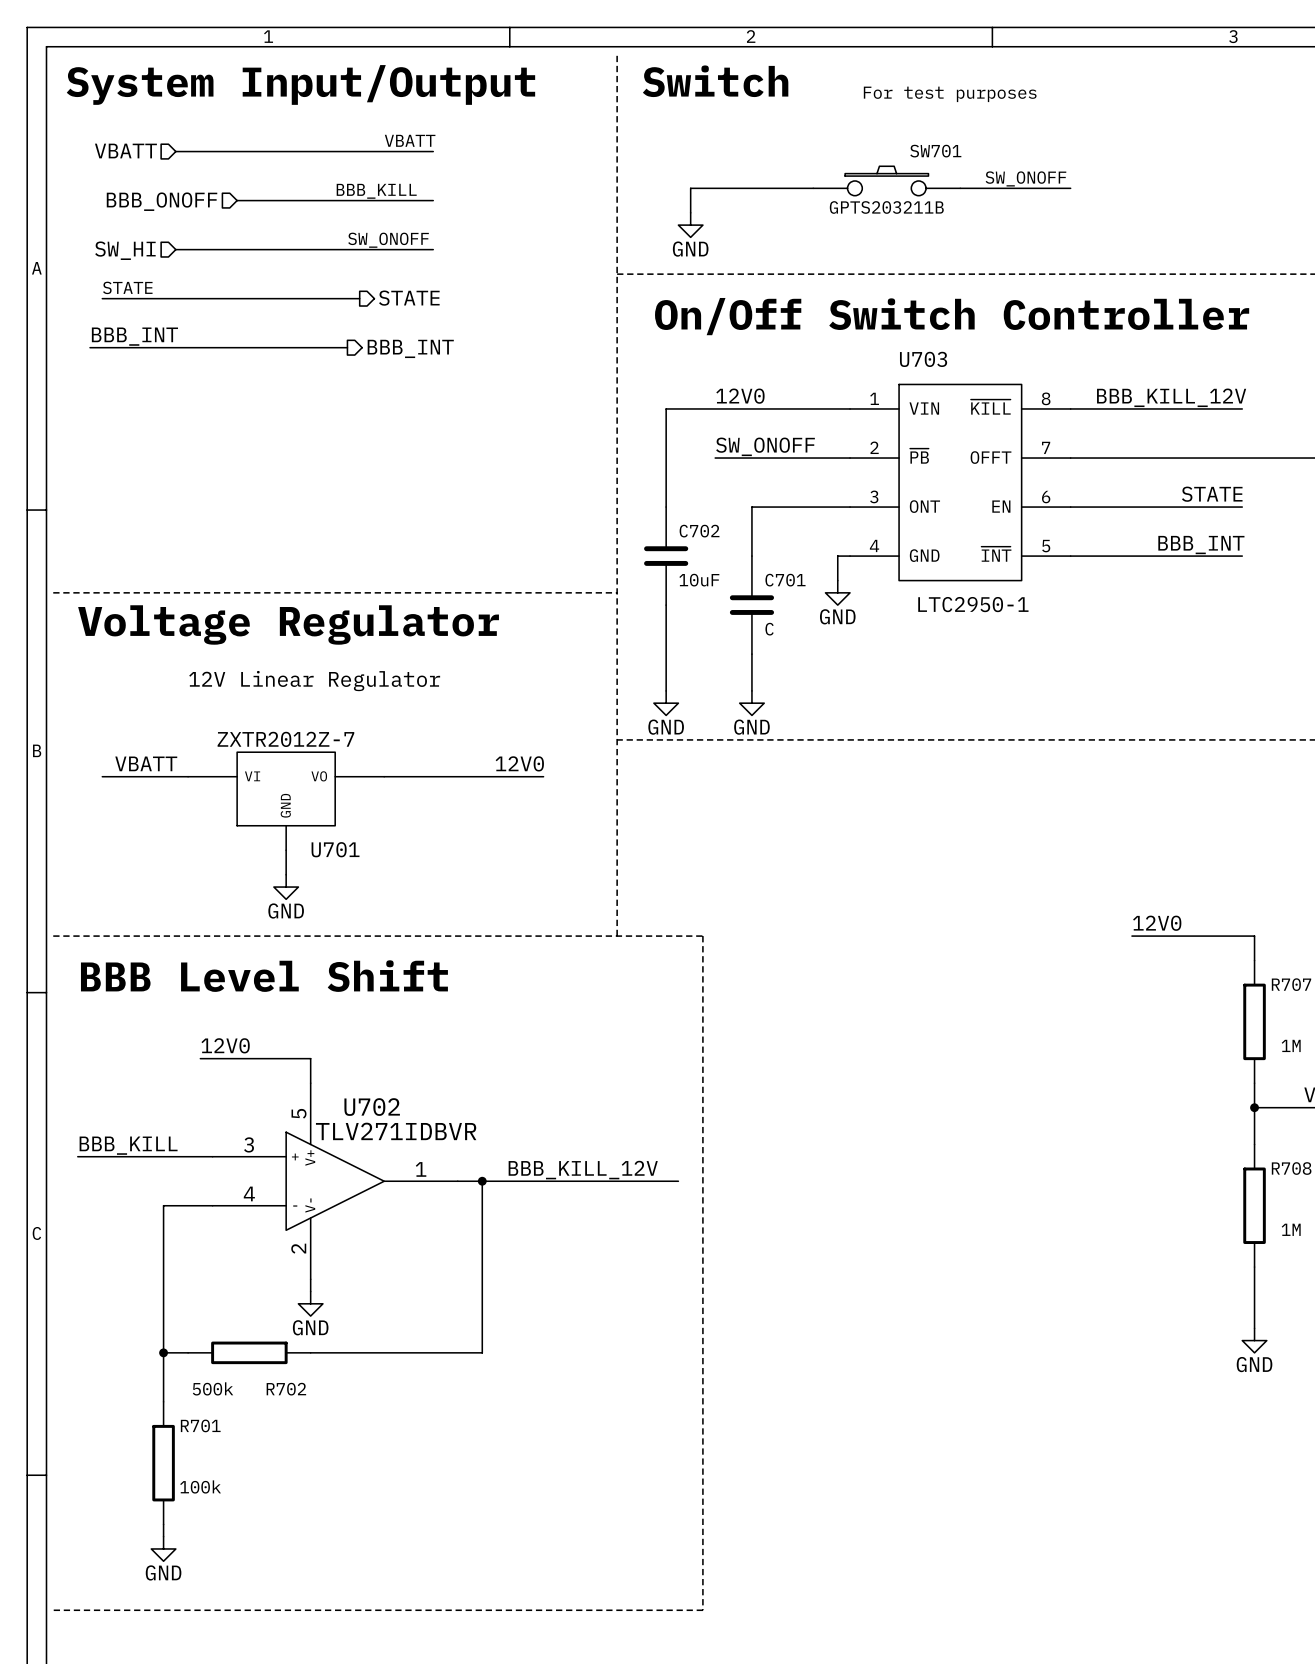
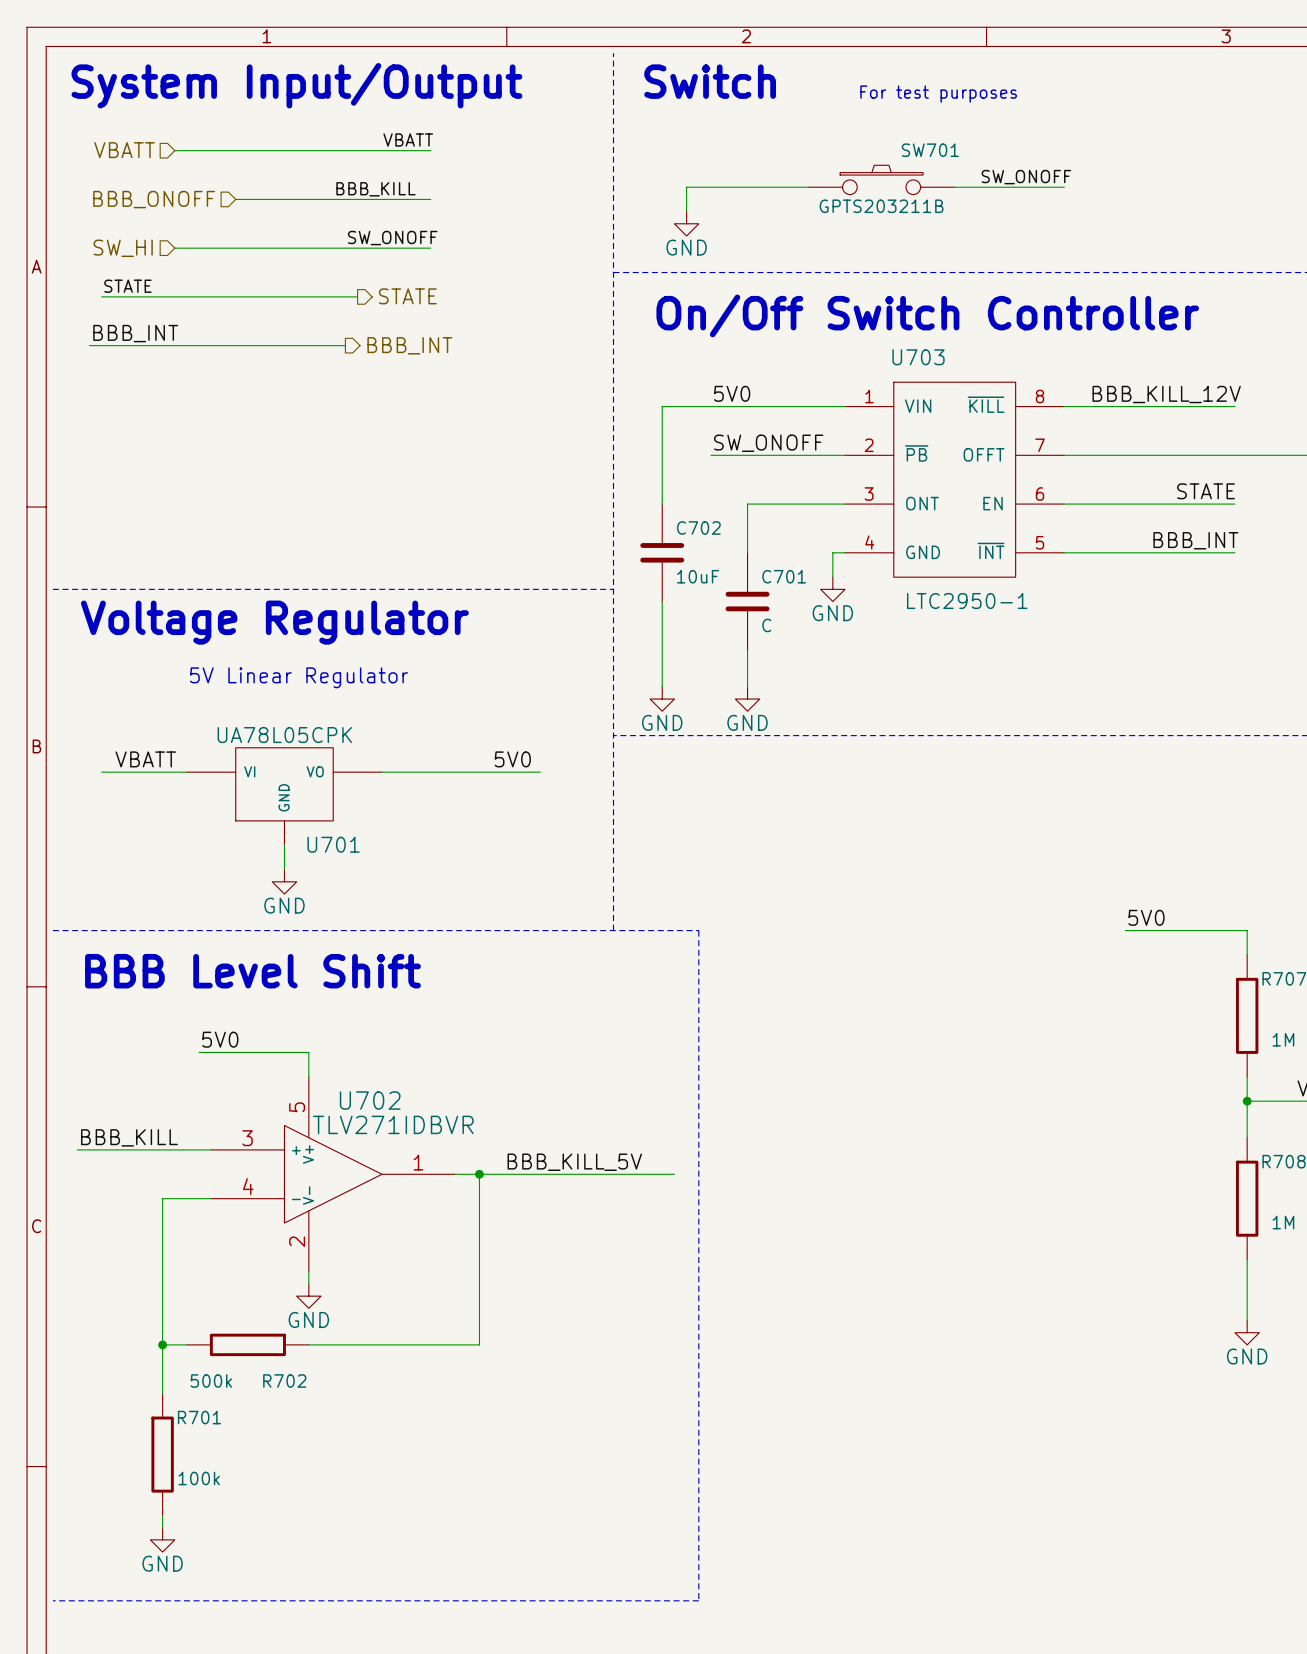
label: 12V0 (740, 396) -> 5V0 (732, 393)
text: 12V Linear Regulator (314, 681) -> 5V Linear Regulator (299, 677)
U701 value: ZXTR2012Z-7 (285, 739) -> UA78L05CPK (284, 735)
label: 12V0 (519, 763) -> 5V0 (512, 759)
label: 12V0 (1157, 923) -> 5V0 (1146, 917)
label: 12V0 (225, 1045) -> 5V0 (220, 1039)
label: BBB_KILL_12V (583, 1170) -> BBB_KILL_5V (574, 1162)

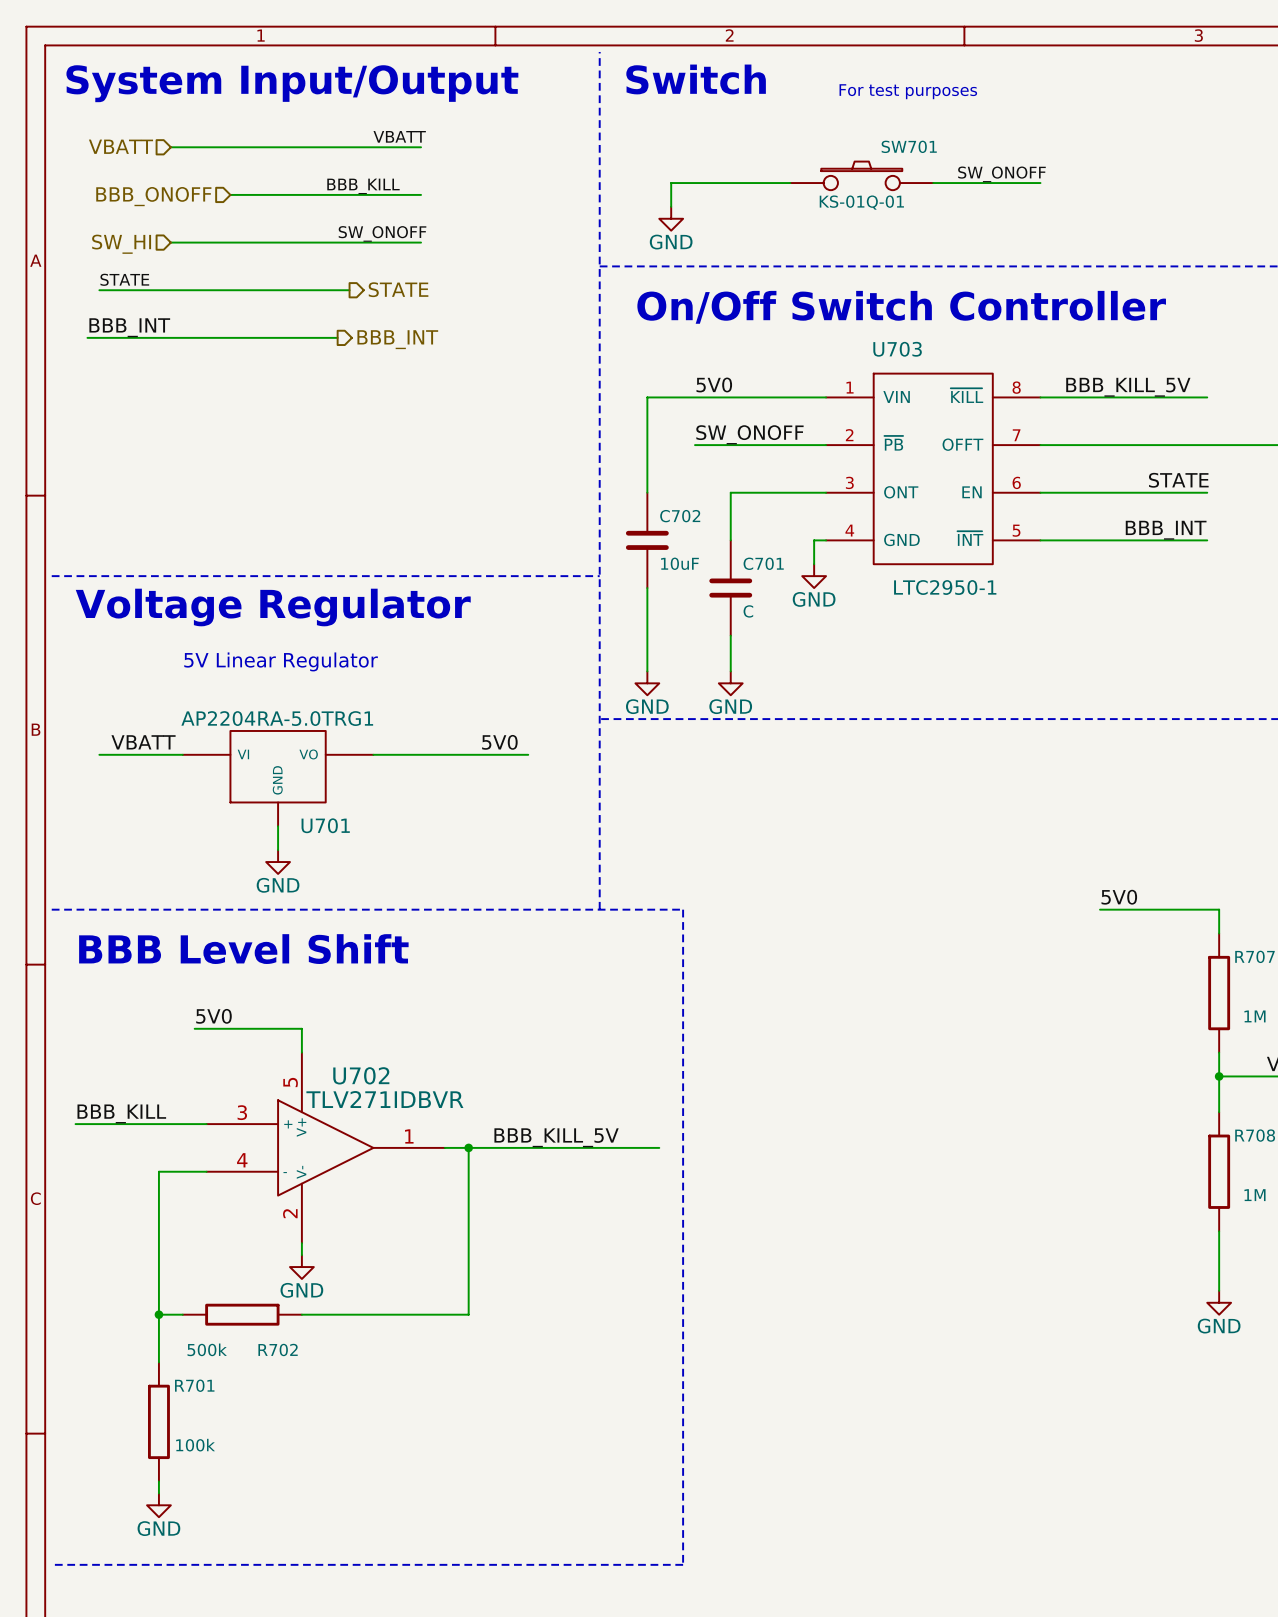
SW701 value: GPTS203211B (881, 206) -> KS-01Q-01 (861, 202)
label: BBB_KILL_12V (1166, 394) -> BBB_KILL_5V (1128, 387)
U701 value: UA78L05CPK (284, 735) -> AP2204RA-5.0TRG1 (277, 718)

